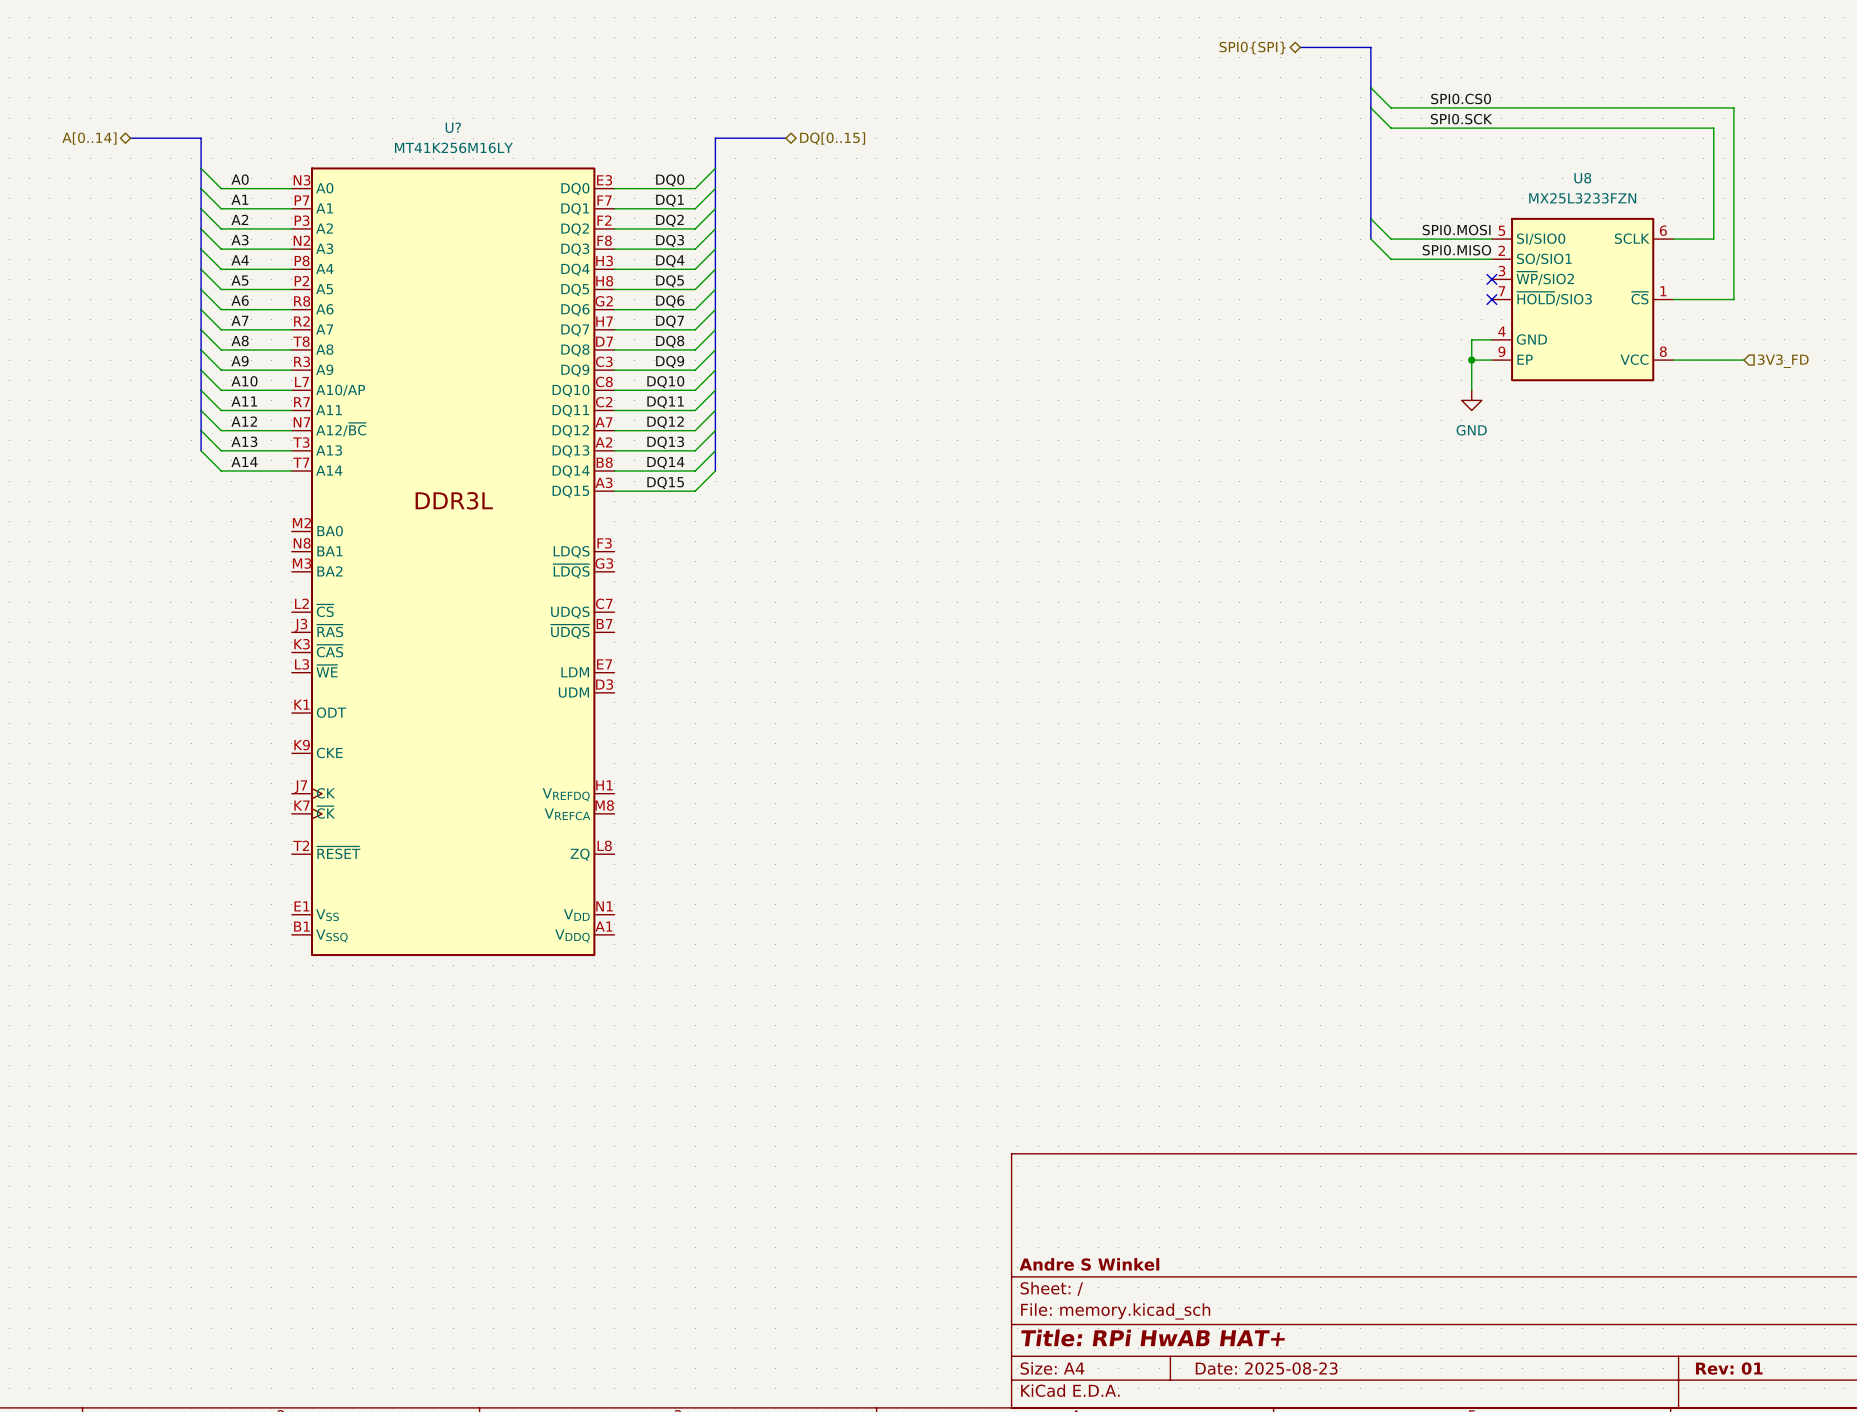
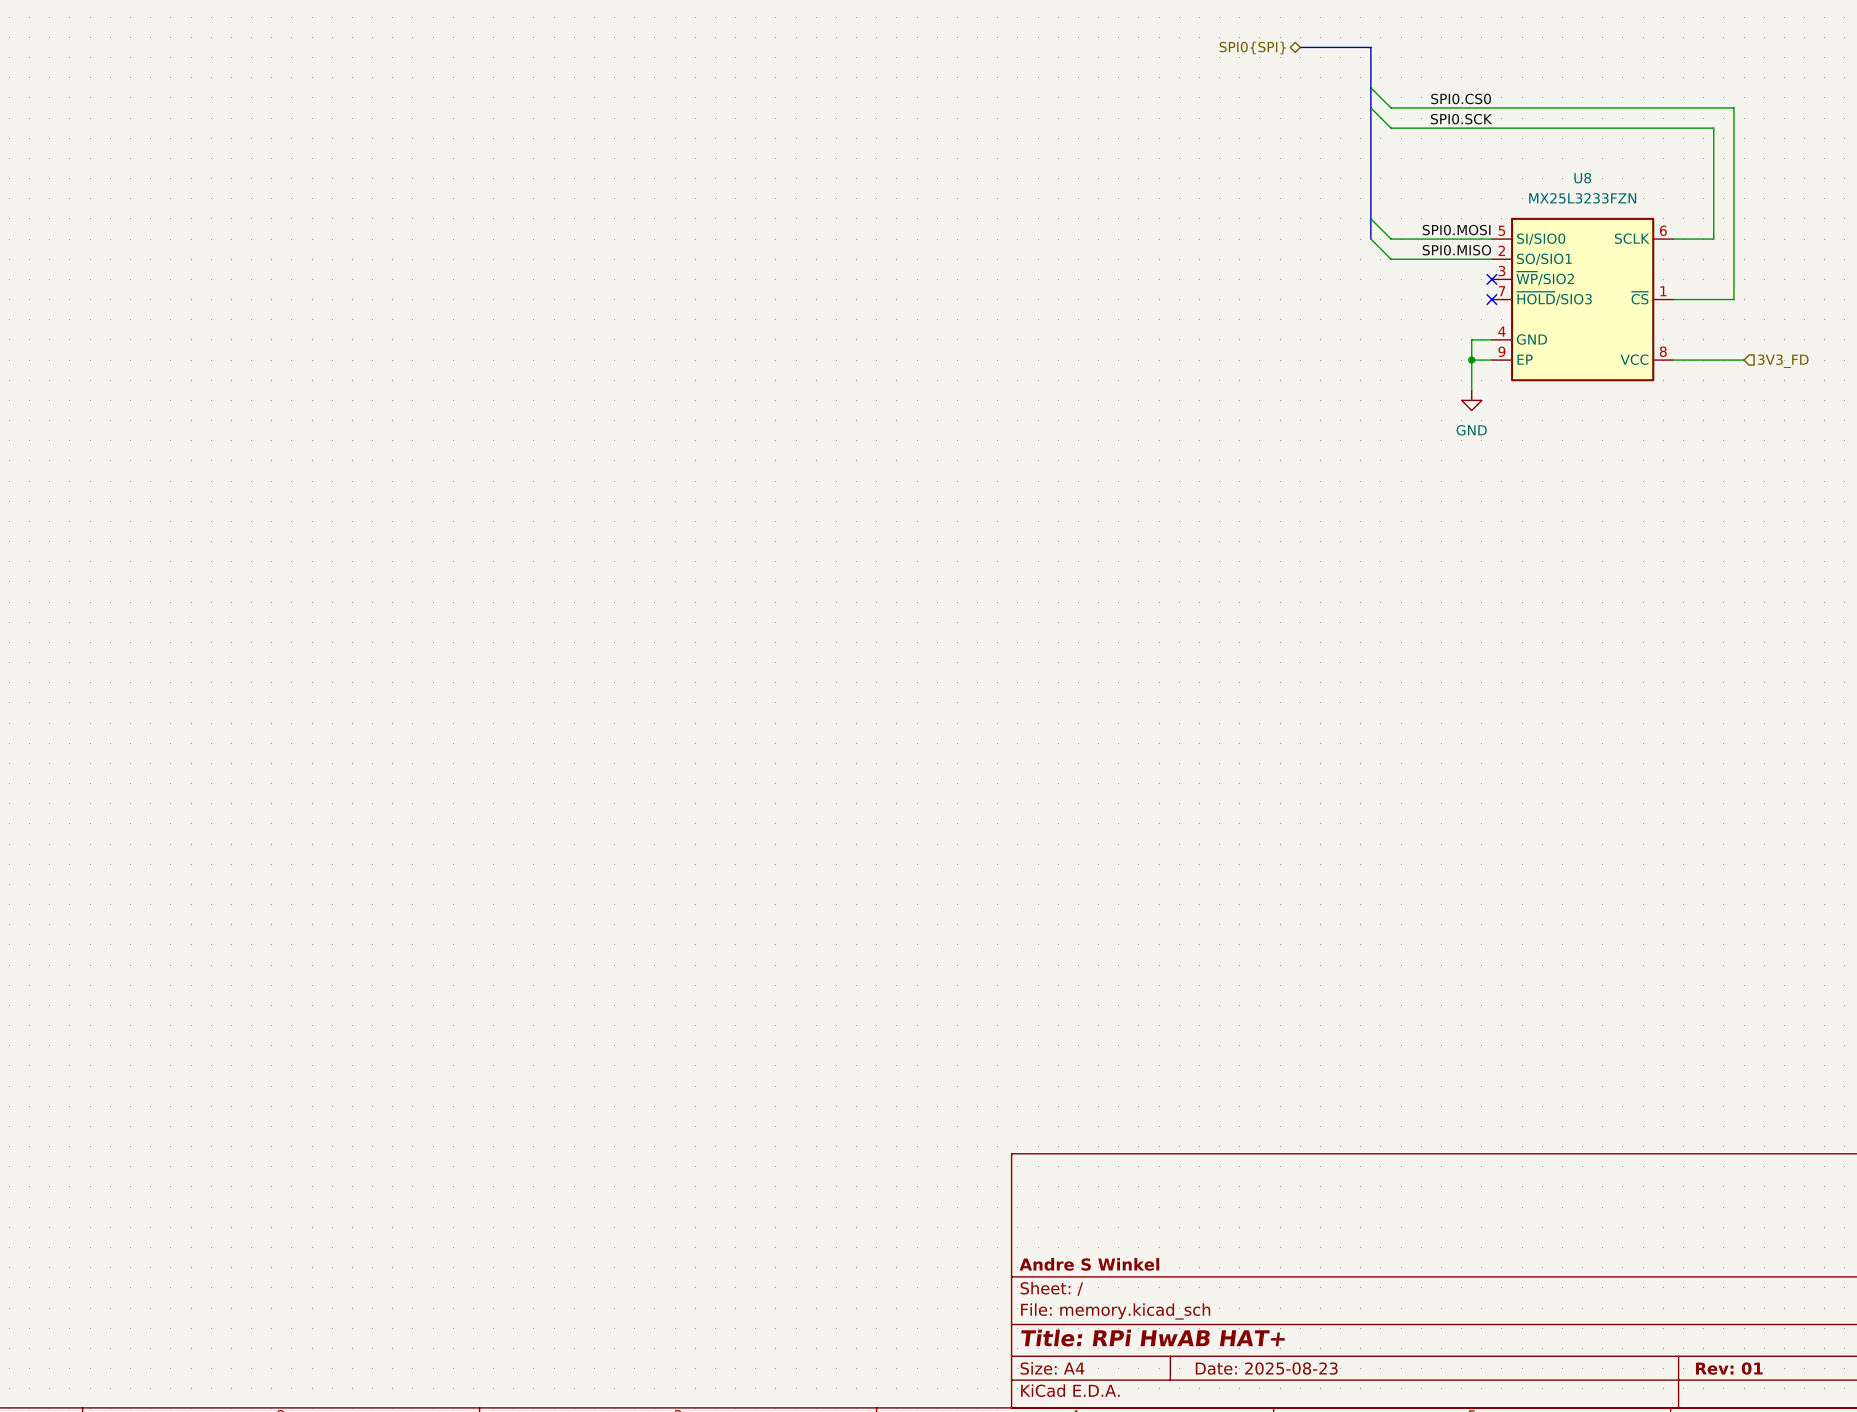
hierarchical label: A[0..14] (89, 138) -> none
bus: (130, 138) (201, 138) (201, 450) -> none
bus: (785, 138) (715, 138) (715, 470) -> none
hierarchical label: DQ[0..15] (832, 138) -> none
wire: (201, 168) (221, 188) (291, 188) -> none
wire: (715, 168) (695, 188) (614, 188) -> none
label: A0 (240, 179) -> none
label: DQ0 (670, 180) -> none
wire: (201, 188) (221, 208) (291, 208) -> none
wire: (715, 188) (695, 208) (614, 208) -> none
label: A1 (239, 199) -> none
label: DQ1 (670, 200) -> none
wire: (201, 208) (221, 228) (291, 228) -> none
wire: (715, 208) (695, 228) (614, 228) -> none
label: A2 (239, 219) -> none
label: DQ2 (669, 220) -> none
wire: (201, 228) (221, 249) (291, 249) -> none
wire: (715, 228) (695, 249) (614, 249) -> none
label: A3 (239, 240) -> none
label: DQ3 (670, 240) -> none
wire: (201, 249) (221, 269) (291, 269) -> none
wire: (715, 249) (695, 269) (614, 269) -> none
label: A4 (240, 260) -> none
label: DQ4 (670, 261) -> none
wire: (201, 269) (221, 289) (291, 289) -> none
wire: (715, 269) (695, 289) (614, 289) -> none
label: A5 (239, 280) -> none
label: DQ5 (670, 281) -> none
wire: (201, 289) (221, 309) (291, 309) -> none
wire: (715, 289) (695, 309) (614, 309) -> none
label: A6 (240, 300) -> none
label: DQ6 (670, 301) -> none
wire: (201, 309) (221, 329) (291, 329) -> none
wire: (715, 309) (695, 329) (614, 329) -> none
label: A7 (239, 320) -> none
label: DQ7 (670, 321) -> none
wire: (201, 329) (221, 349) (291, 349) -> none
wire: (715, 329) (695, 349) (614, 349) -> none
label: A8 (240, 340) -> none
label: DQ8 (670, 341) -> none
wire: (201, 349) (221, 370) (291, 370) -> none
wire: (715, 349) (695, 370) (614, 370) -> none
label: A9 (240, 361) -> none
label: DQ9 (670, 361) -> none
wire: (201, 370) (221, 390) (291, 390) -> none
wire: (715, 370) (695, 390) (614, 390) -> none
label: A10 (244, 381) -> none
label: DQ10 (665, 382) -> none
wire: (201, 390) (221, 410) (291, 410) -> none
wire: (715, 390) (695, 410) (614, 410) -> none
label: A11 (244, 401) -> none
label: DQ11 (665, 402) -> none
wire: (201, 410) (221, 430) (291, 430) -> none
wire: (715, 410) (695, 430) (614, 430) -> none
label: A12 (244, 421) -> none
label: DQ12 (665, 422) -> none
wire: (201, 430) (221, 450) (291, 450) -> none
wire: (715, 430) (695, 450) (614, 450) -> none
label: A13 (244, 441) -> none
label: DQ13 (665, 442) -> none
wire: (201, 450) (221, 470) (291, 470) -> none
wire: (715, 450) (695, 470) (614, 470) -> none
label: A14 (244, 461) -> none
label: DQ14 (665, 462) -> none
wire: (715, 470) (695, 491) (614, 491) -> none
label: DQ15 (665, 482) -> none
U?: MT41K256M16LY (453, 561) -> none

